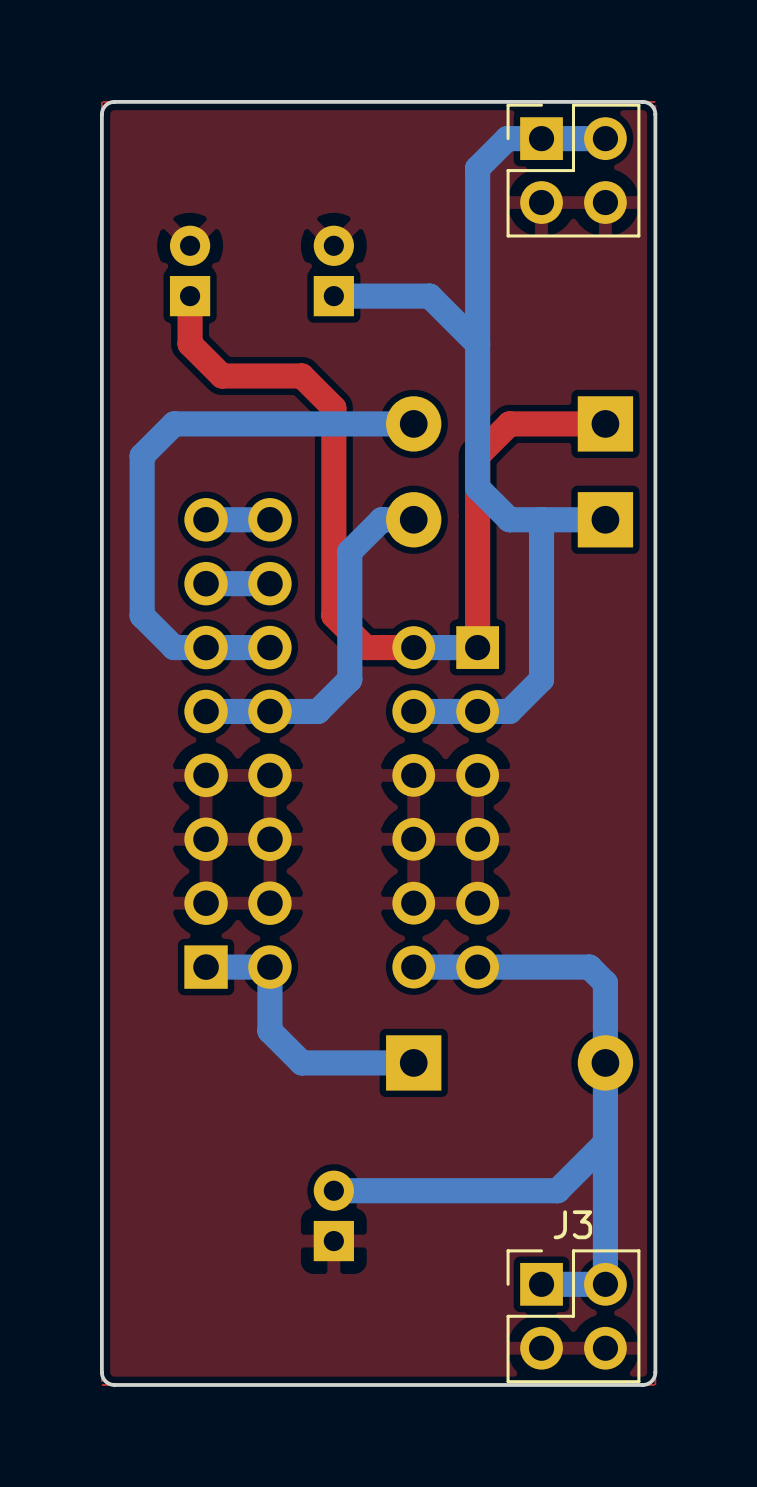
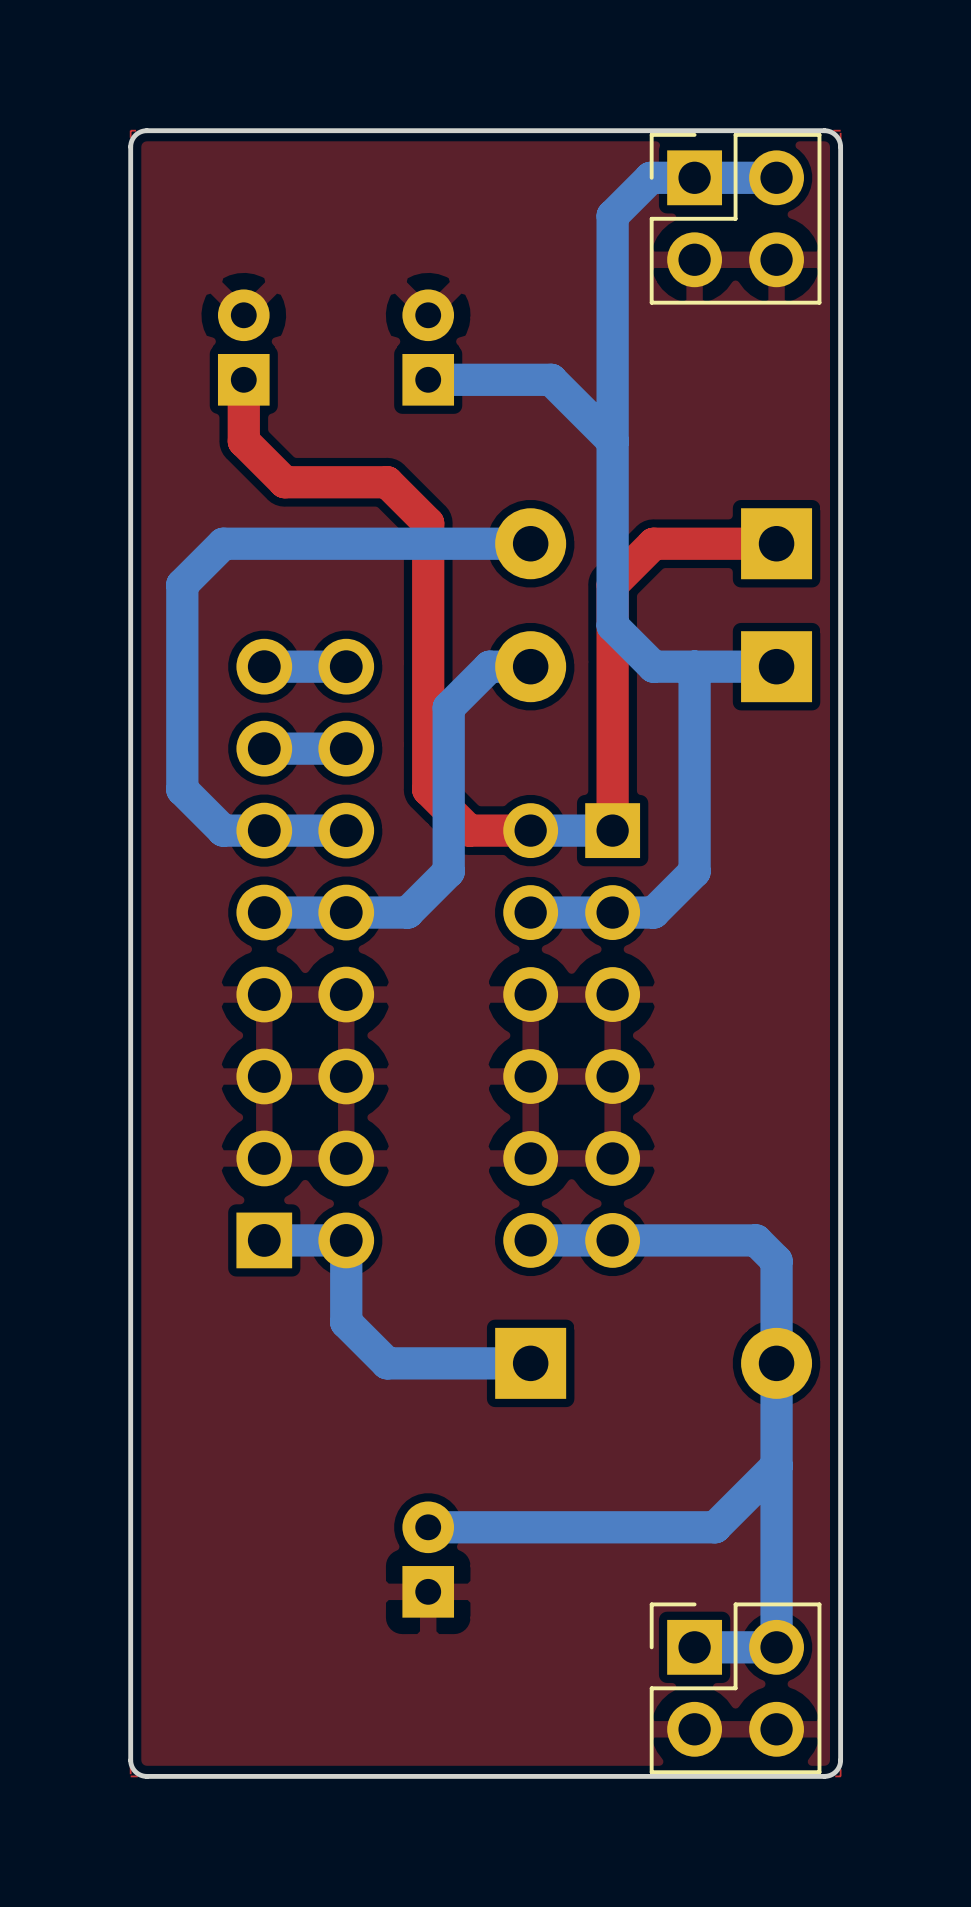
J3 name: J3 (572, 1224) -> none

